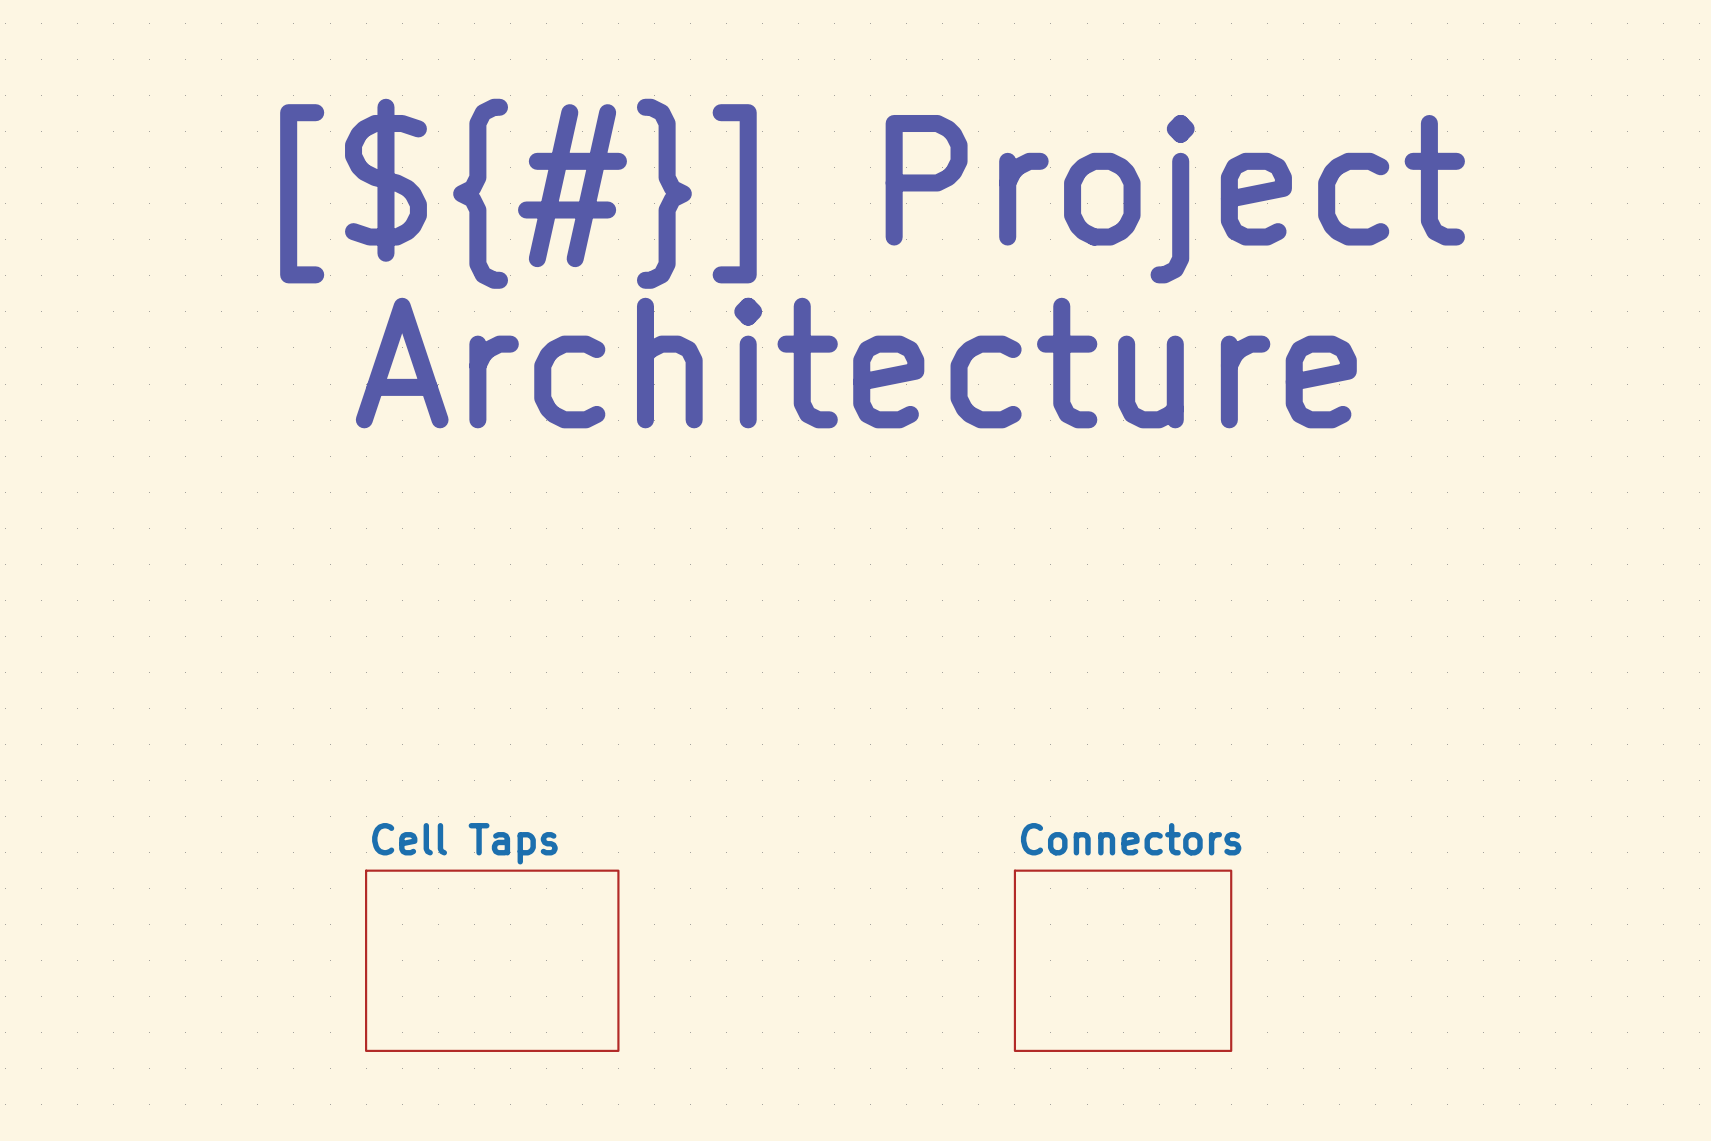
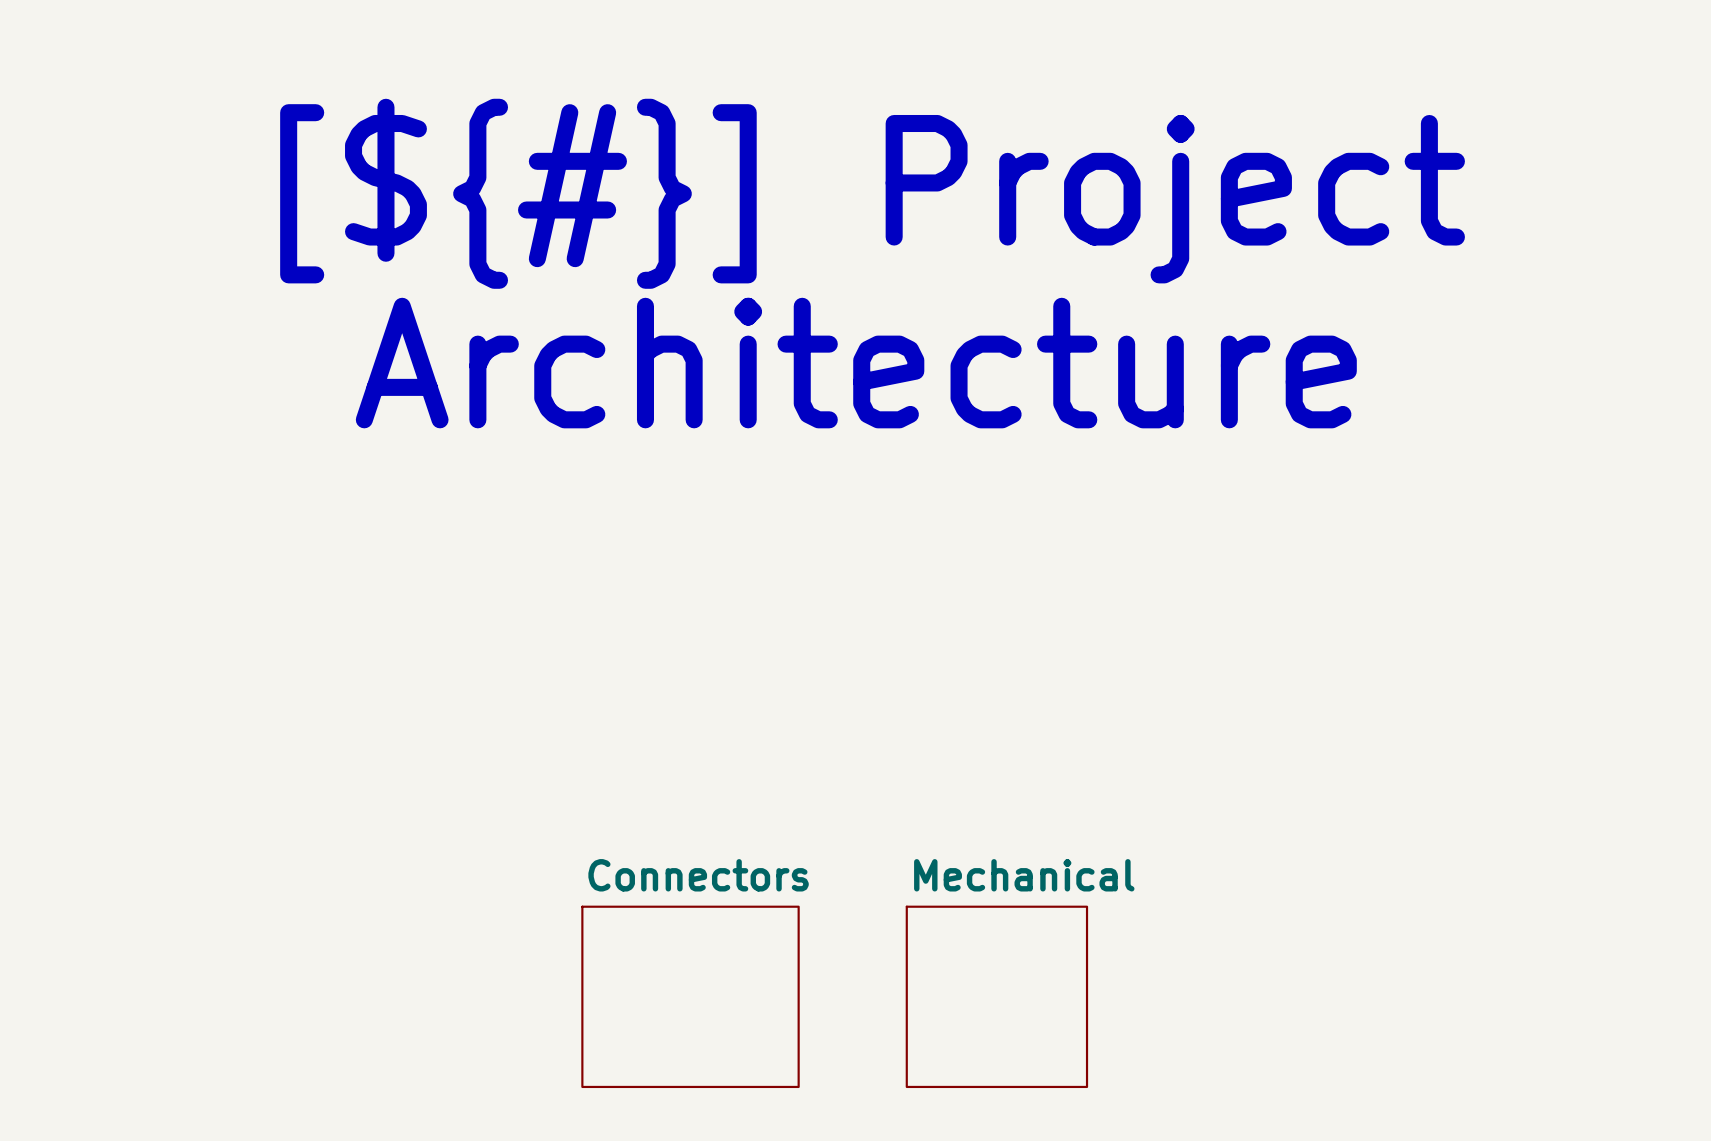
sheet Cell Taps: (492, 960) -> none
sheet Connectors: (1123, 960) -> none
sheet Connectors: none -> (690, 996)
sheet Mechanical: none -> (996, 996)

